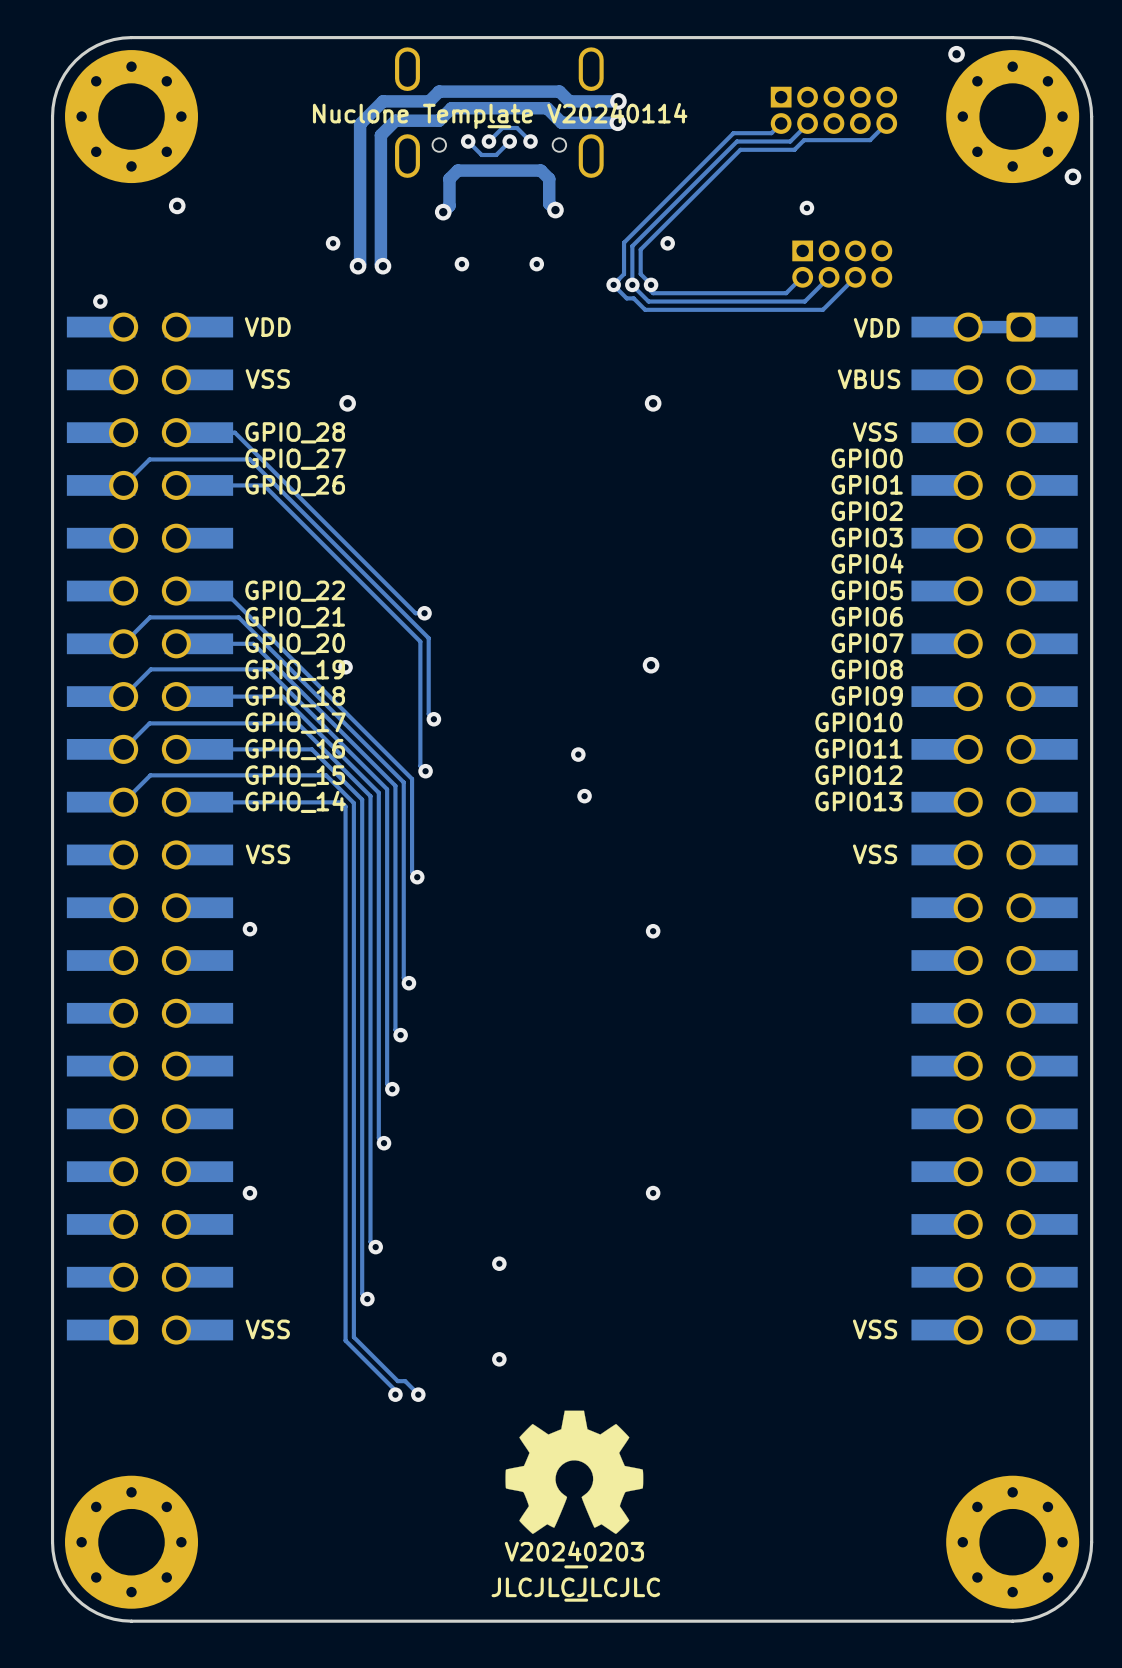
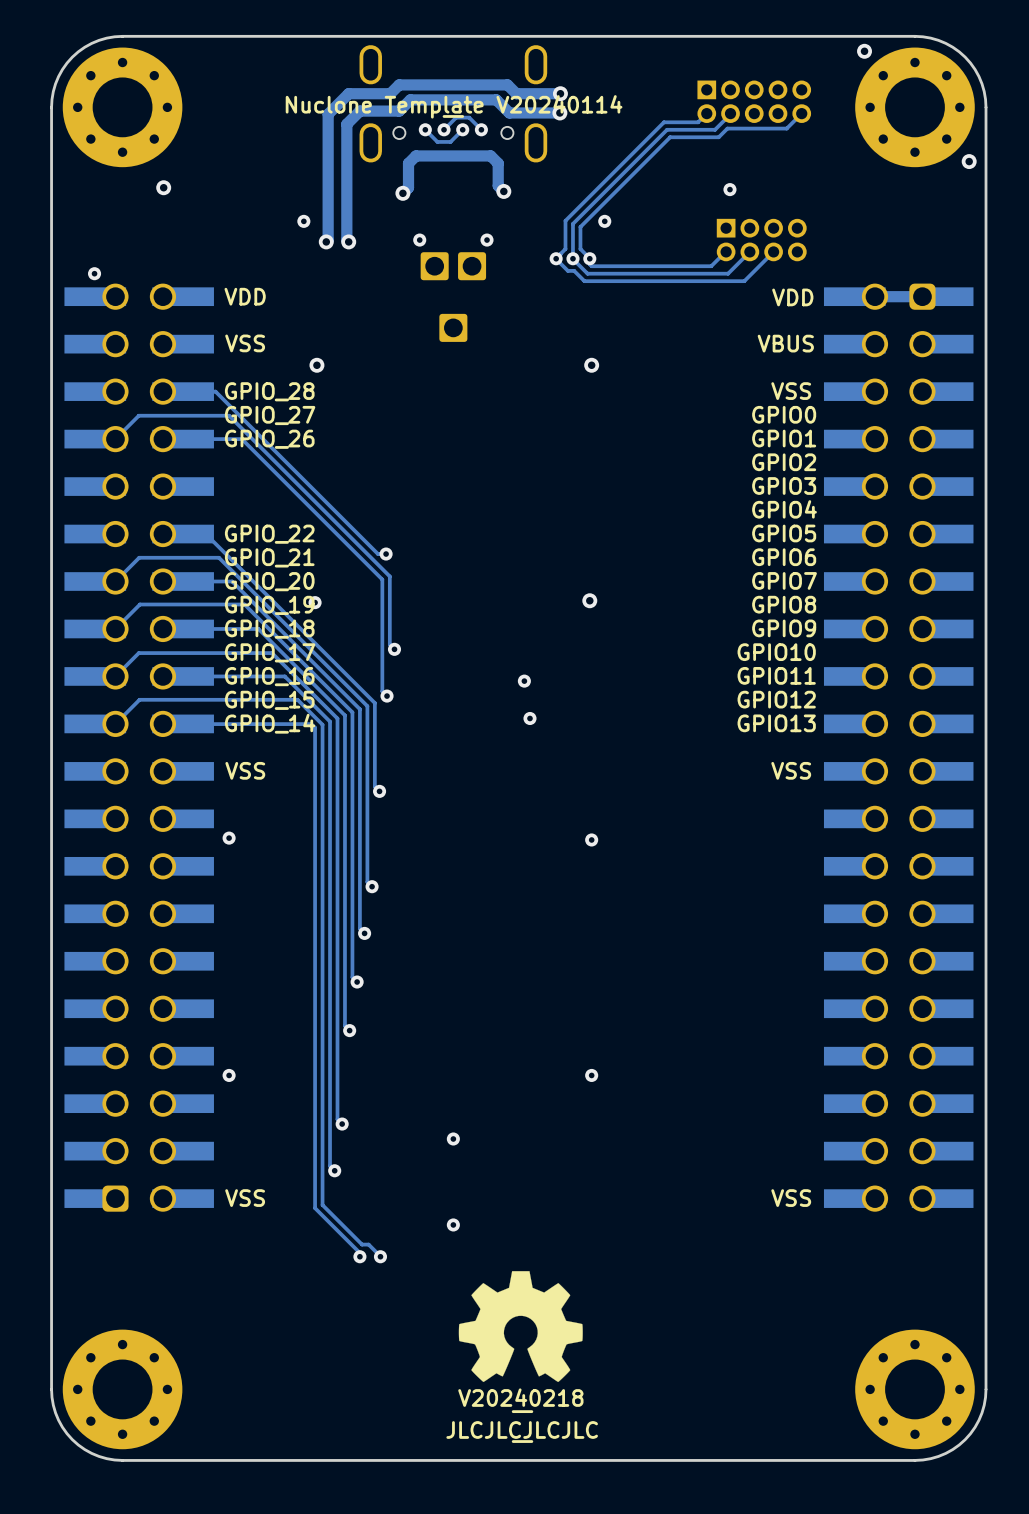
part: none -> (453, 297)
drawing shape: [504, 1541, 645, 1569] -> [458, 1388, 584, 1414]

